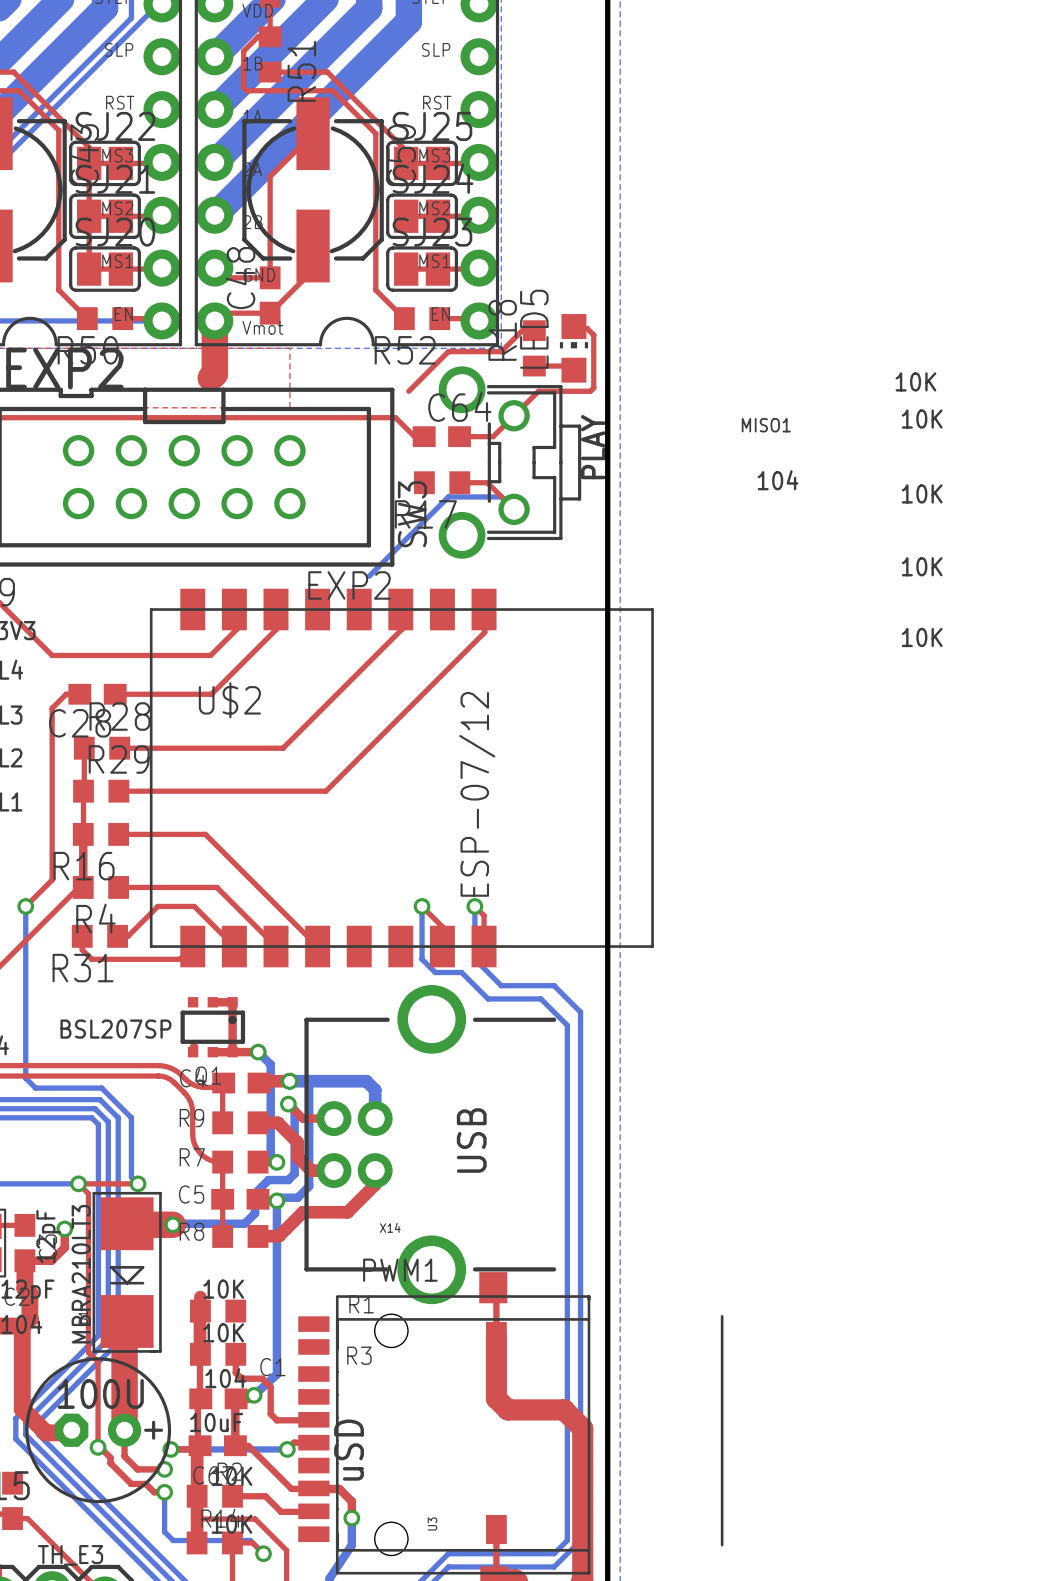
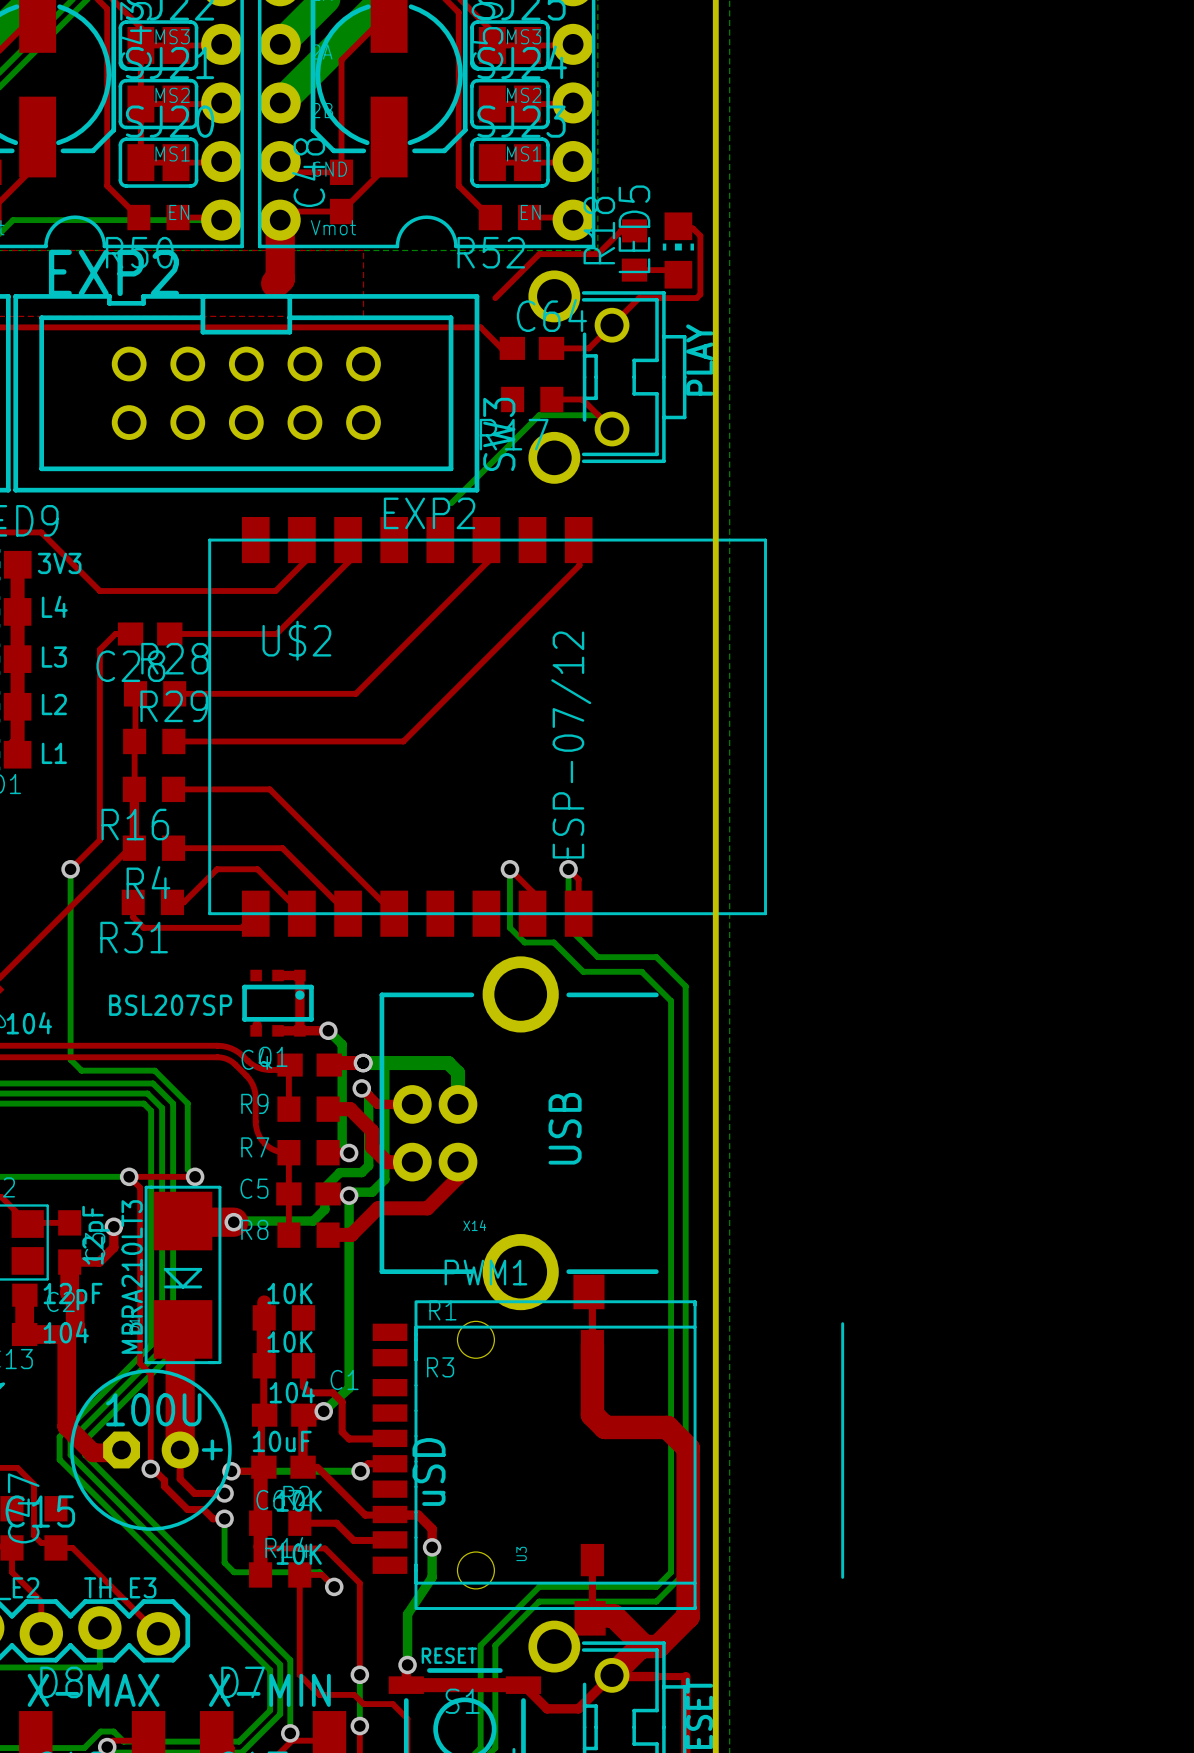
text: 10K (915, 381) -> none
text: 10K (922, 419) -> none
text: MISO1 (766, 425) -> none
text: 104 (778, 480) -> none
text: 10K (922, 493) -> none
text: 10K (922, 566) -> none
text: 10K (922, 637) -> none

